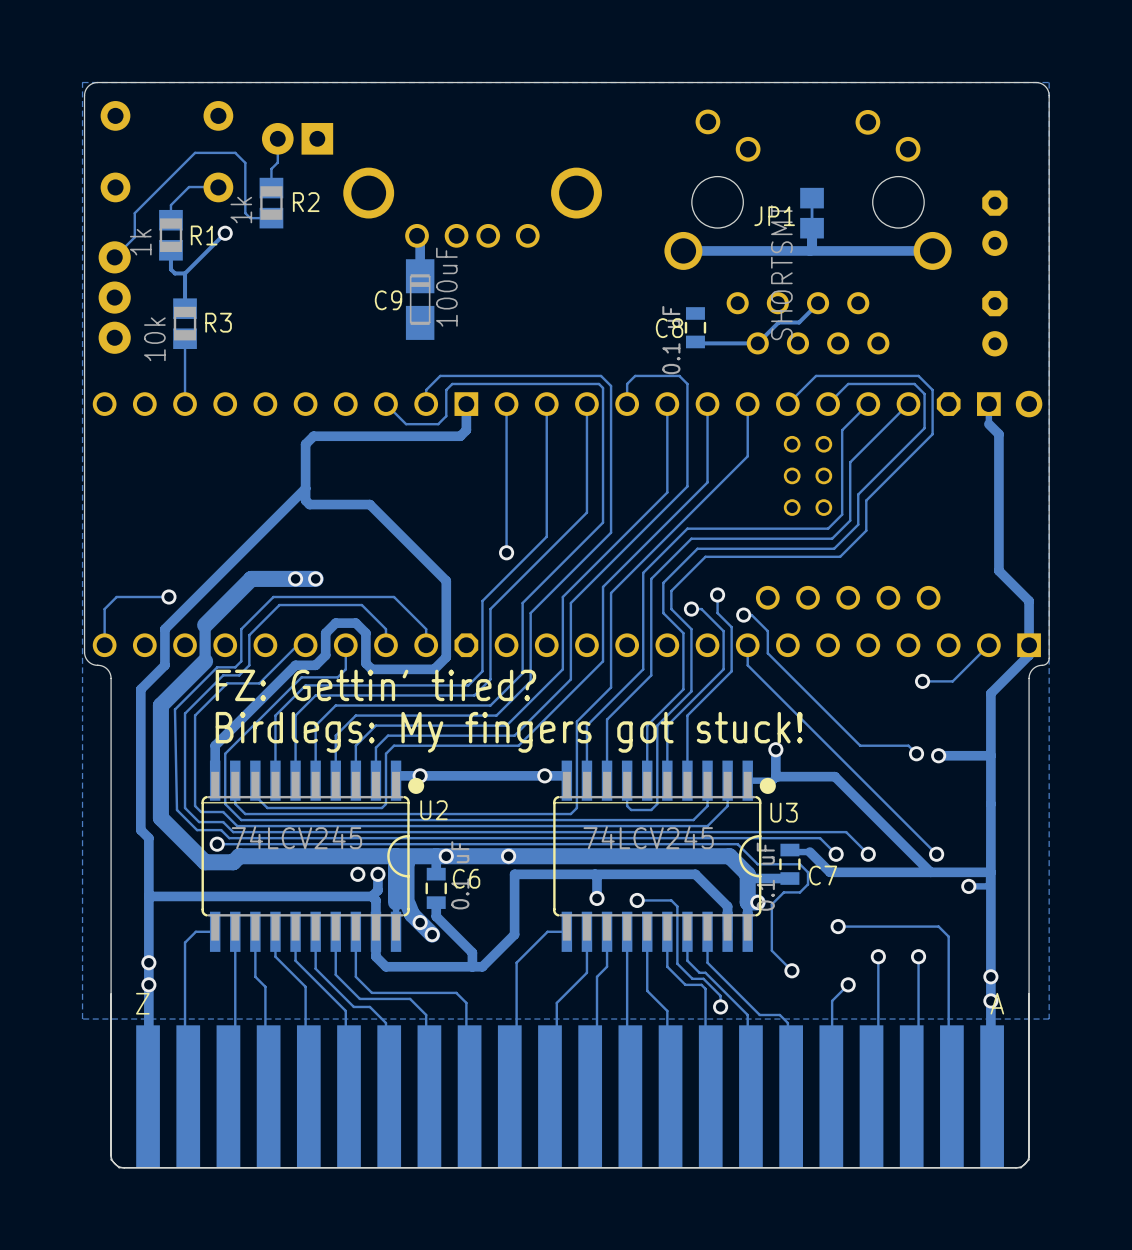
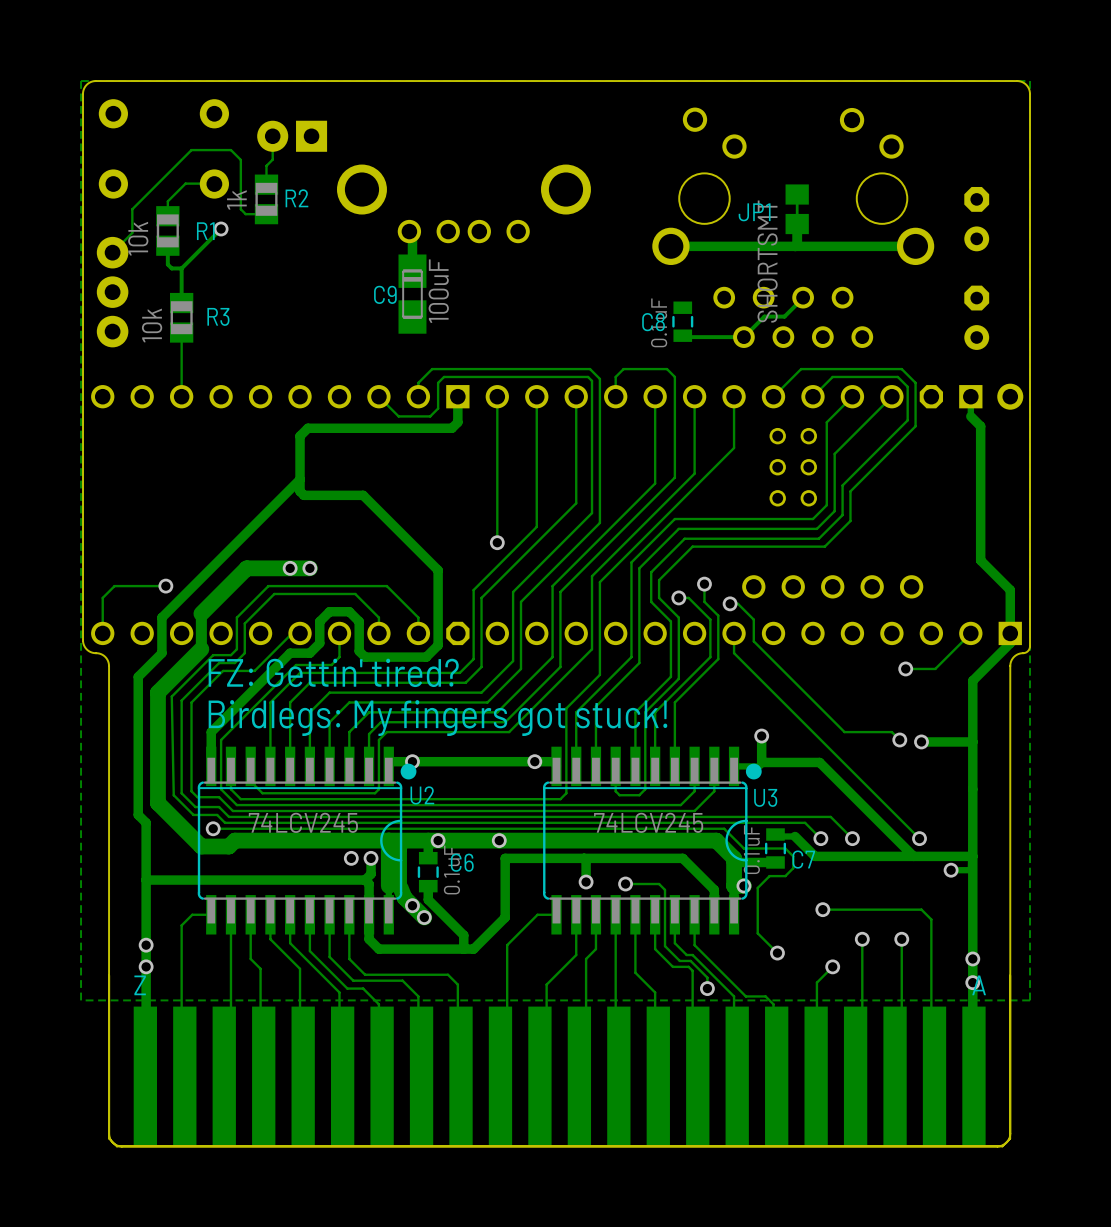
R1 value: 1k (140, 242) -> 10k (138, 238)

